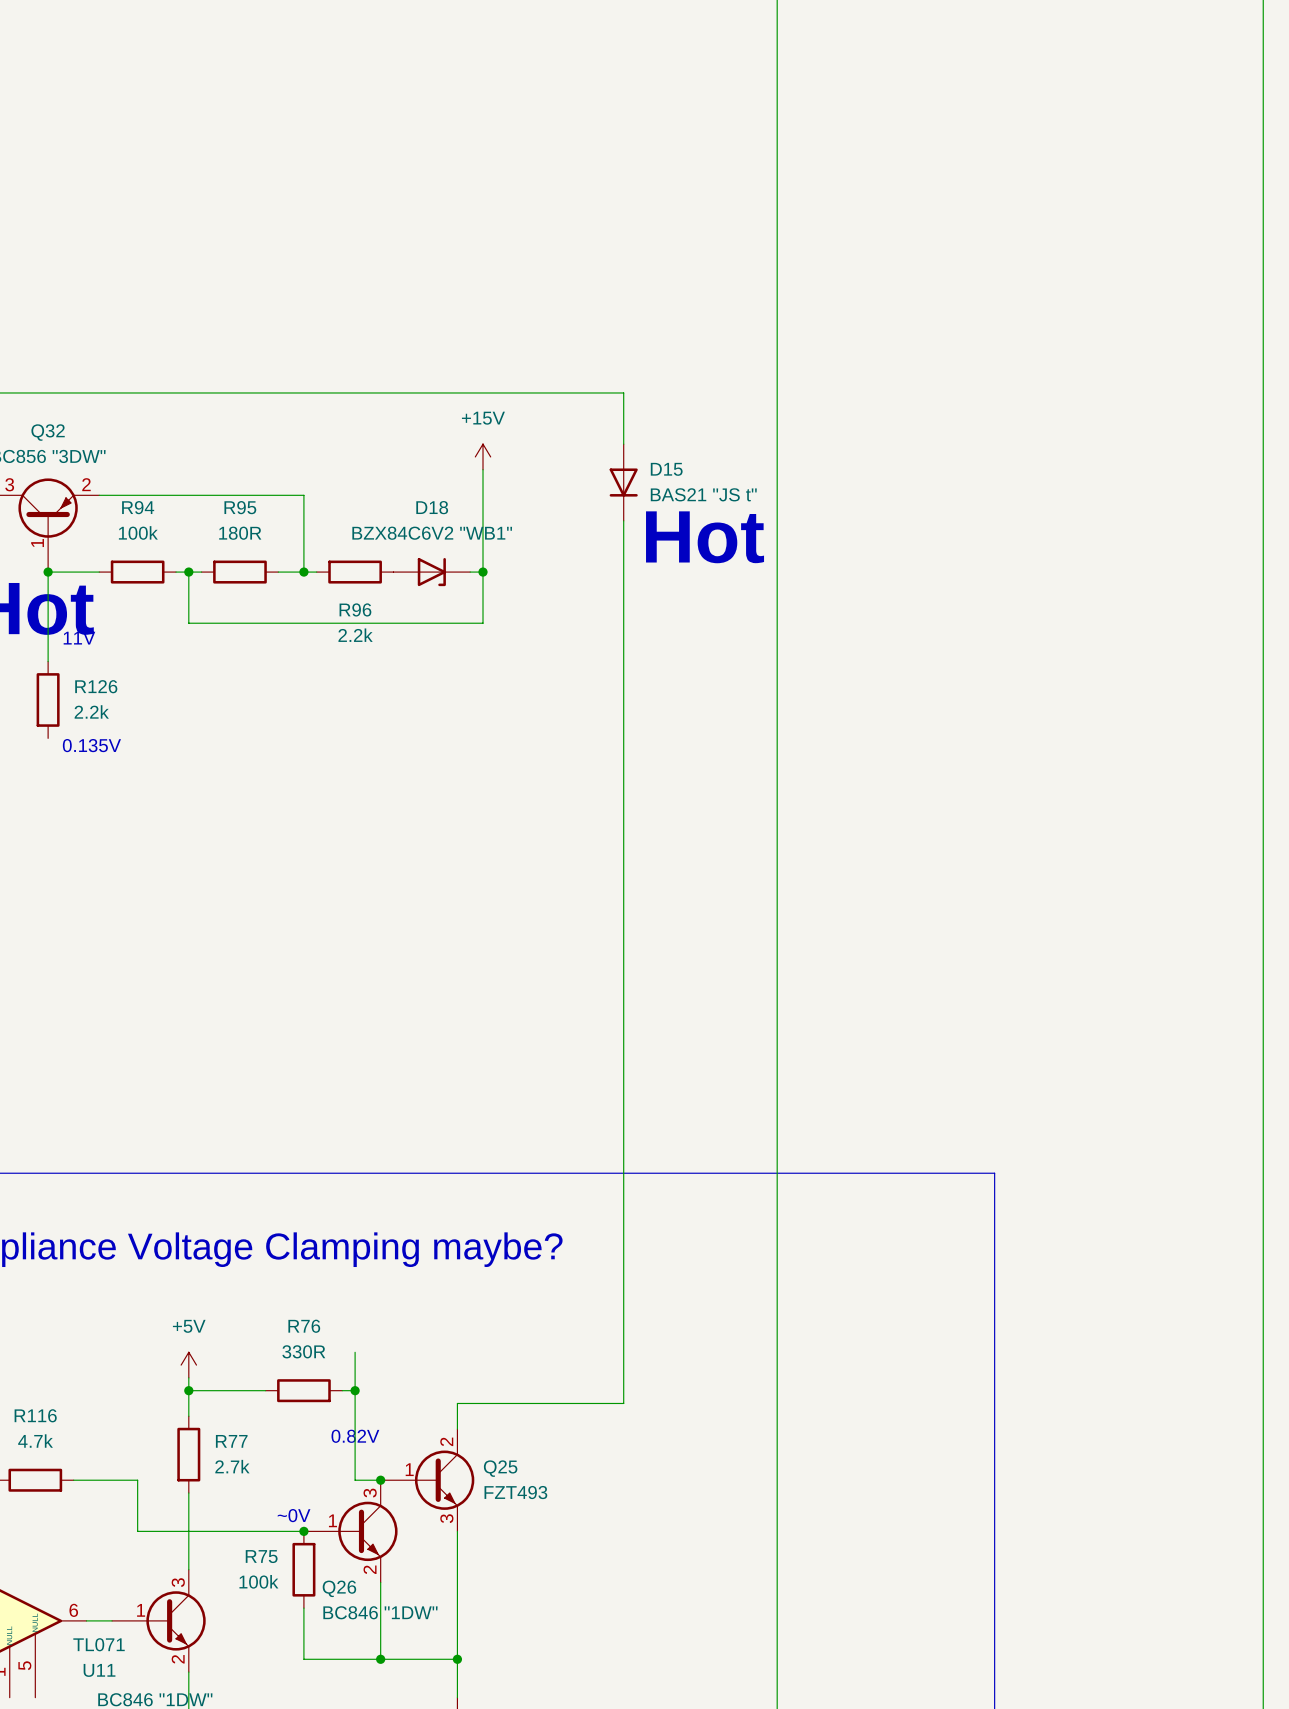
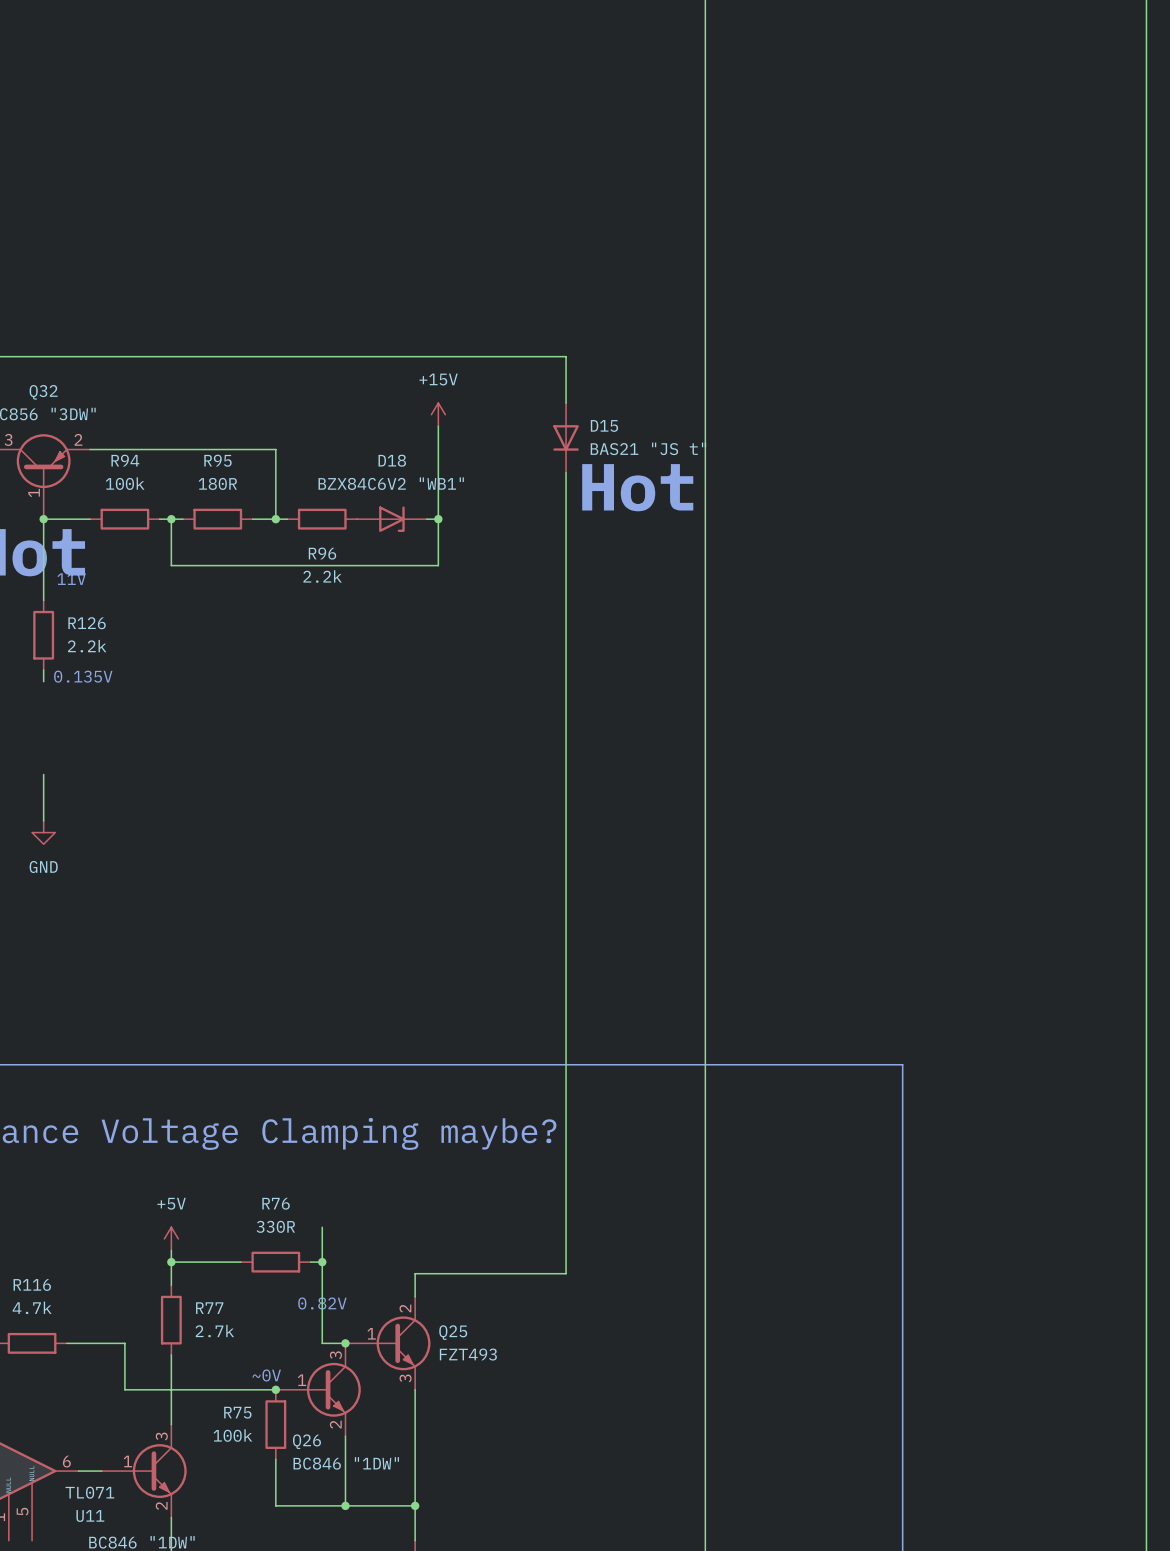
wire: none -> (43, 670) (43, 681)
wire: none -> (43, 774) (43, 820)
power symbol: none -> GND (43, 832)

